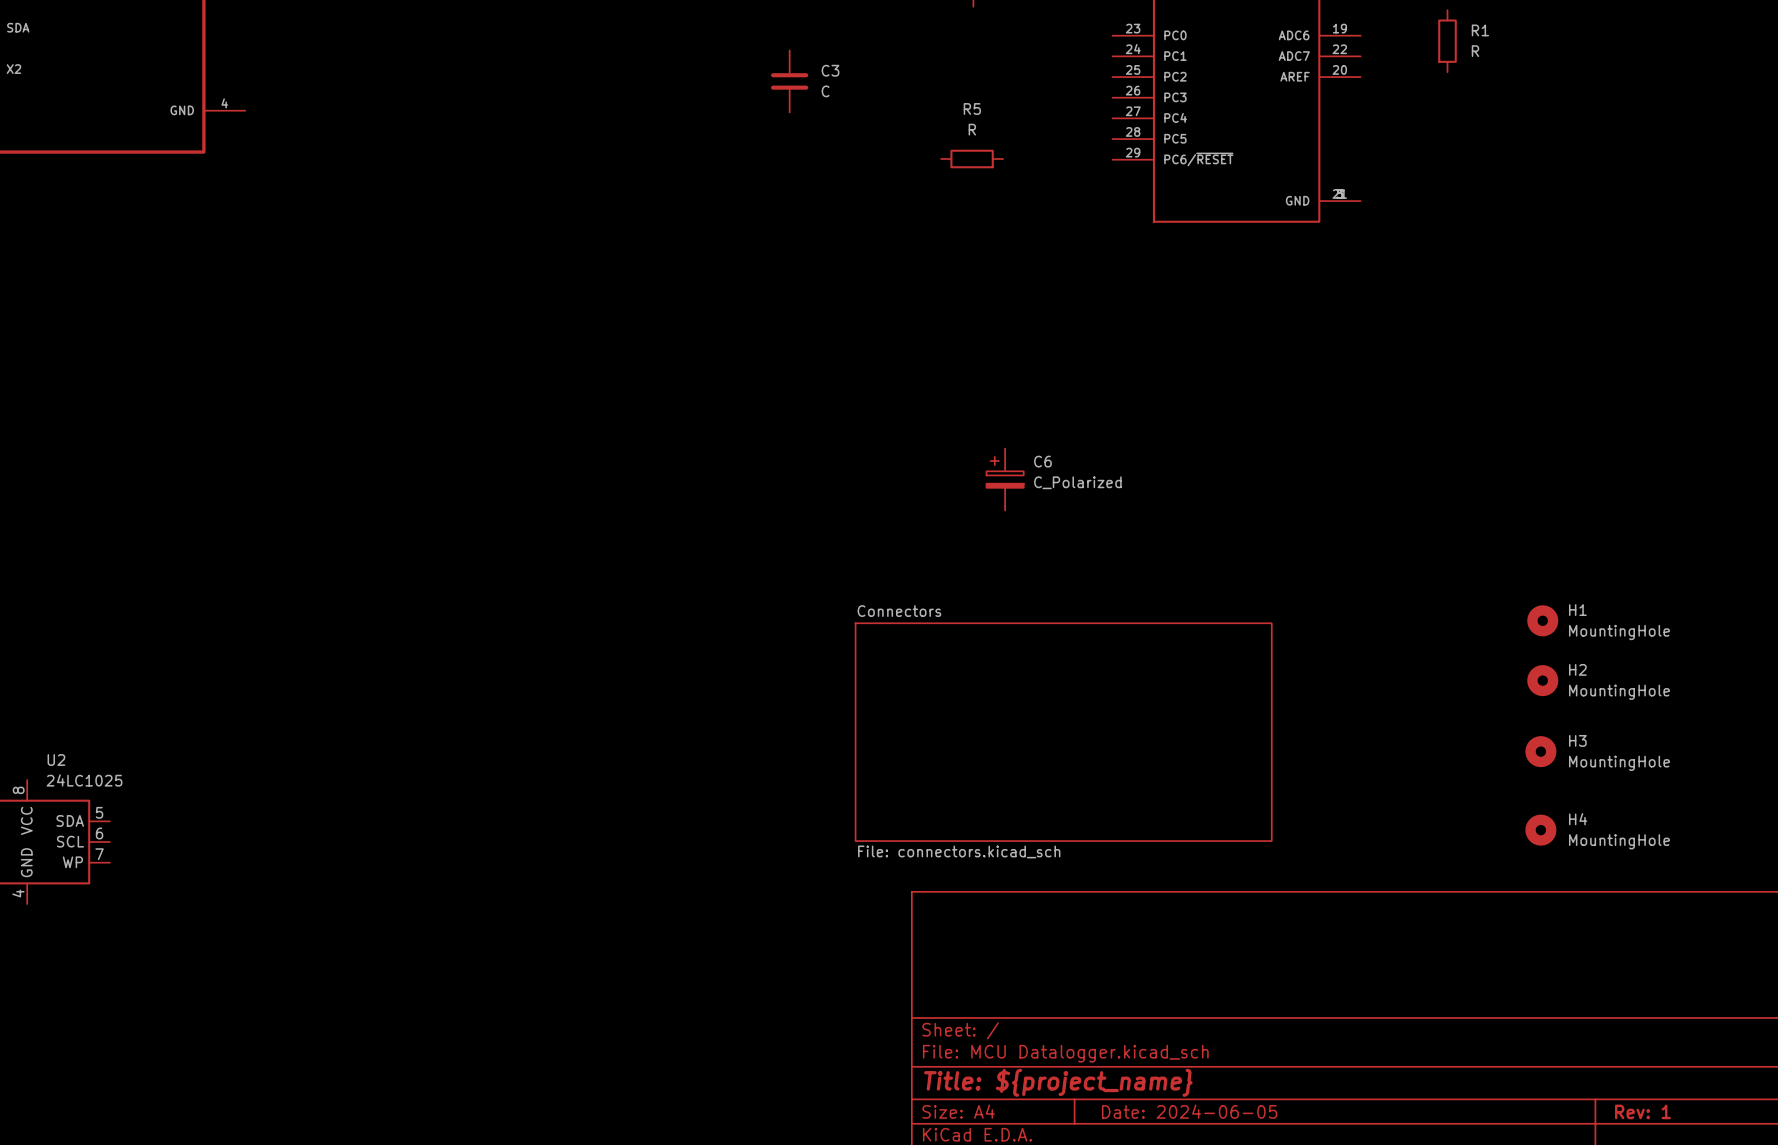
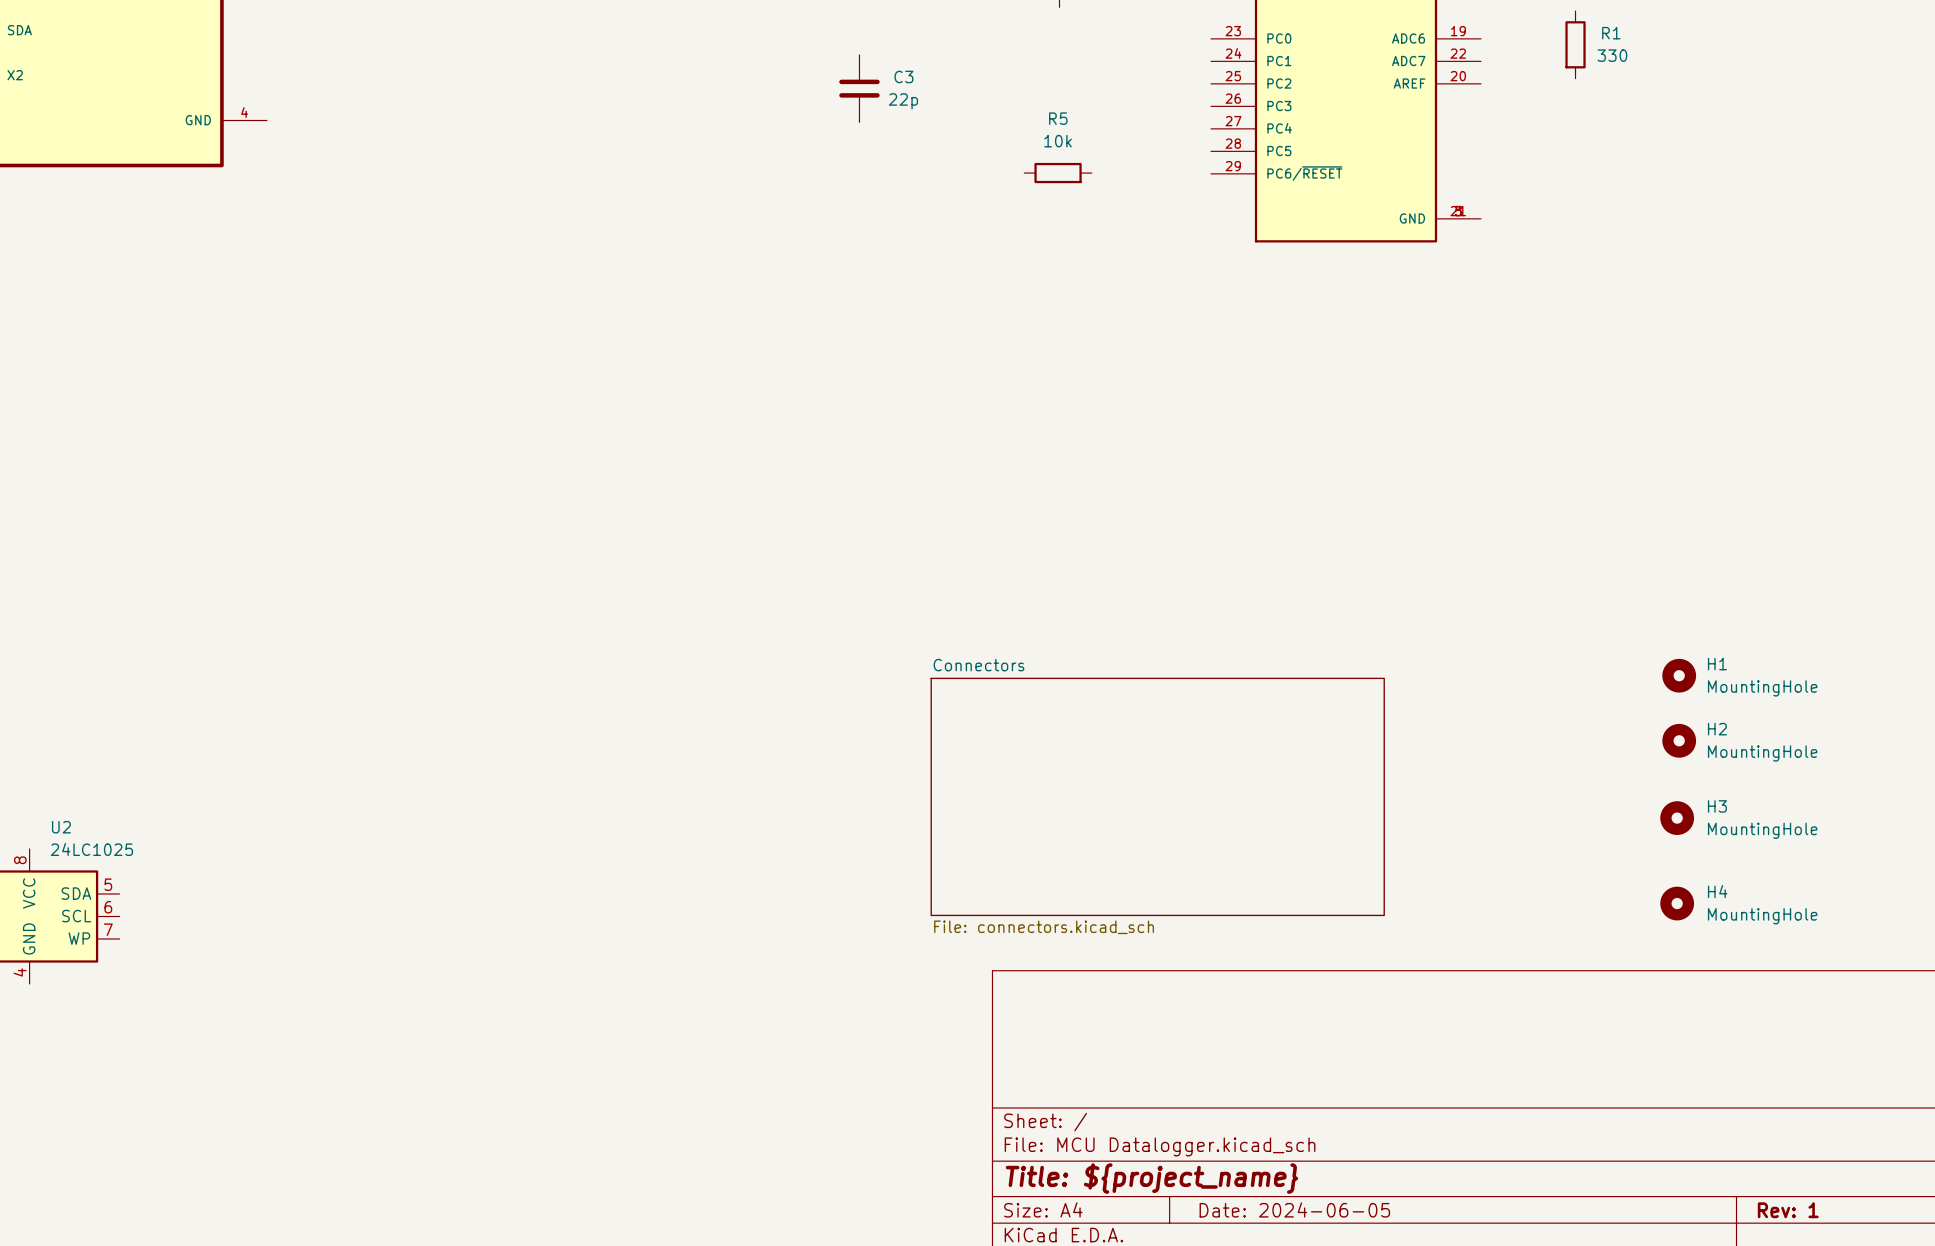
R1 value: R (1475, 51) -> 330 (1612, 55)
C3 value: C (825, 91) -> 22p (903, 101)
R5 value: R (972, 129) -> 10k (1058, 141)
C6: C_Polarized (1005, 479) -> none

